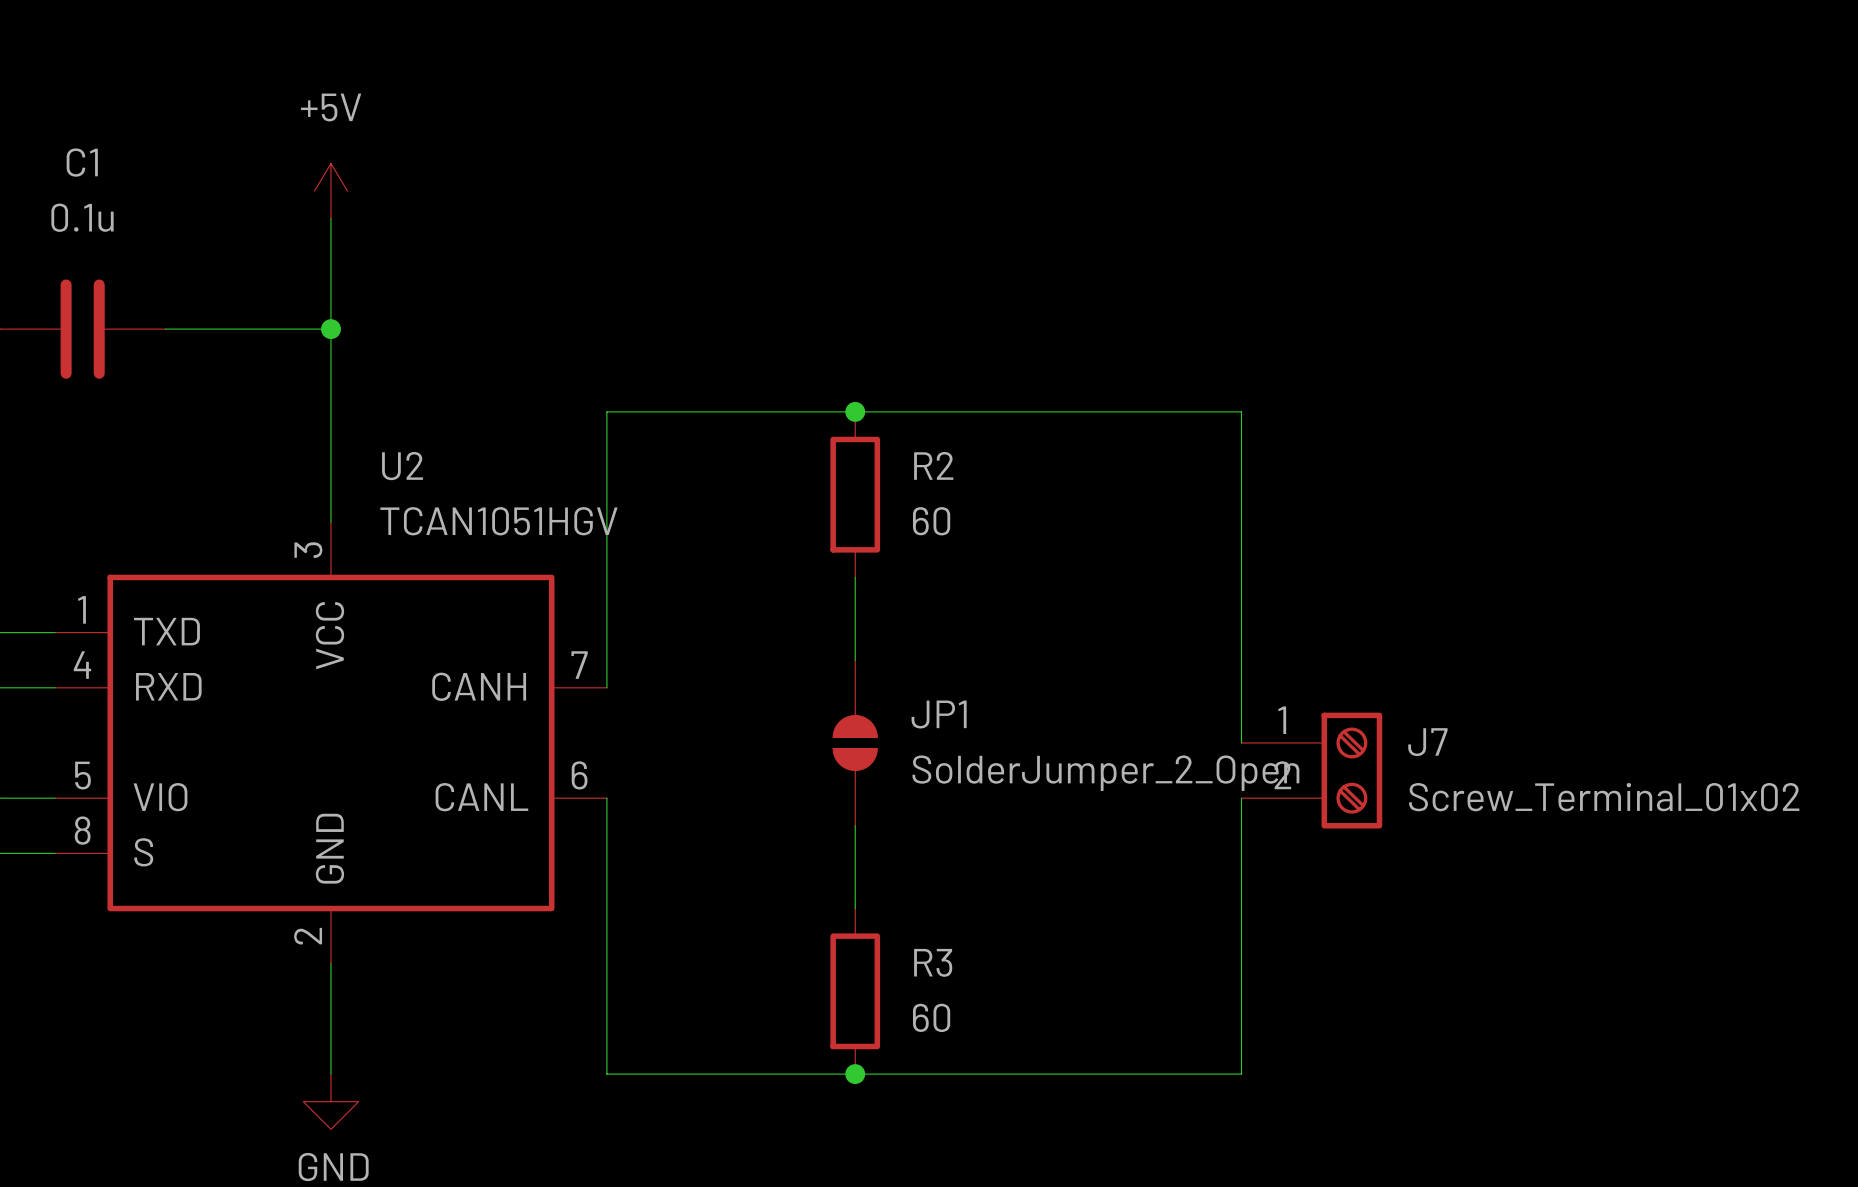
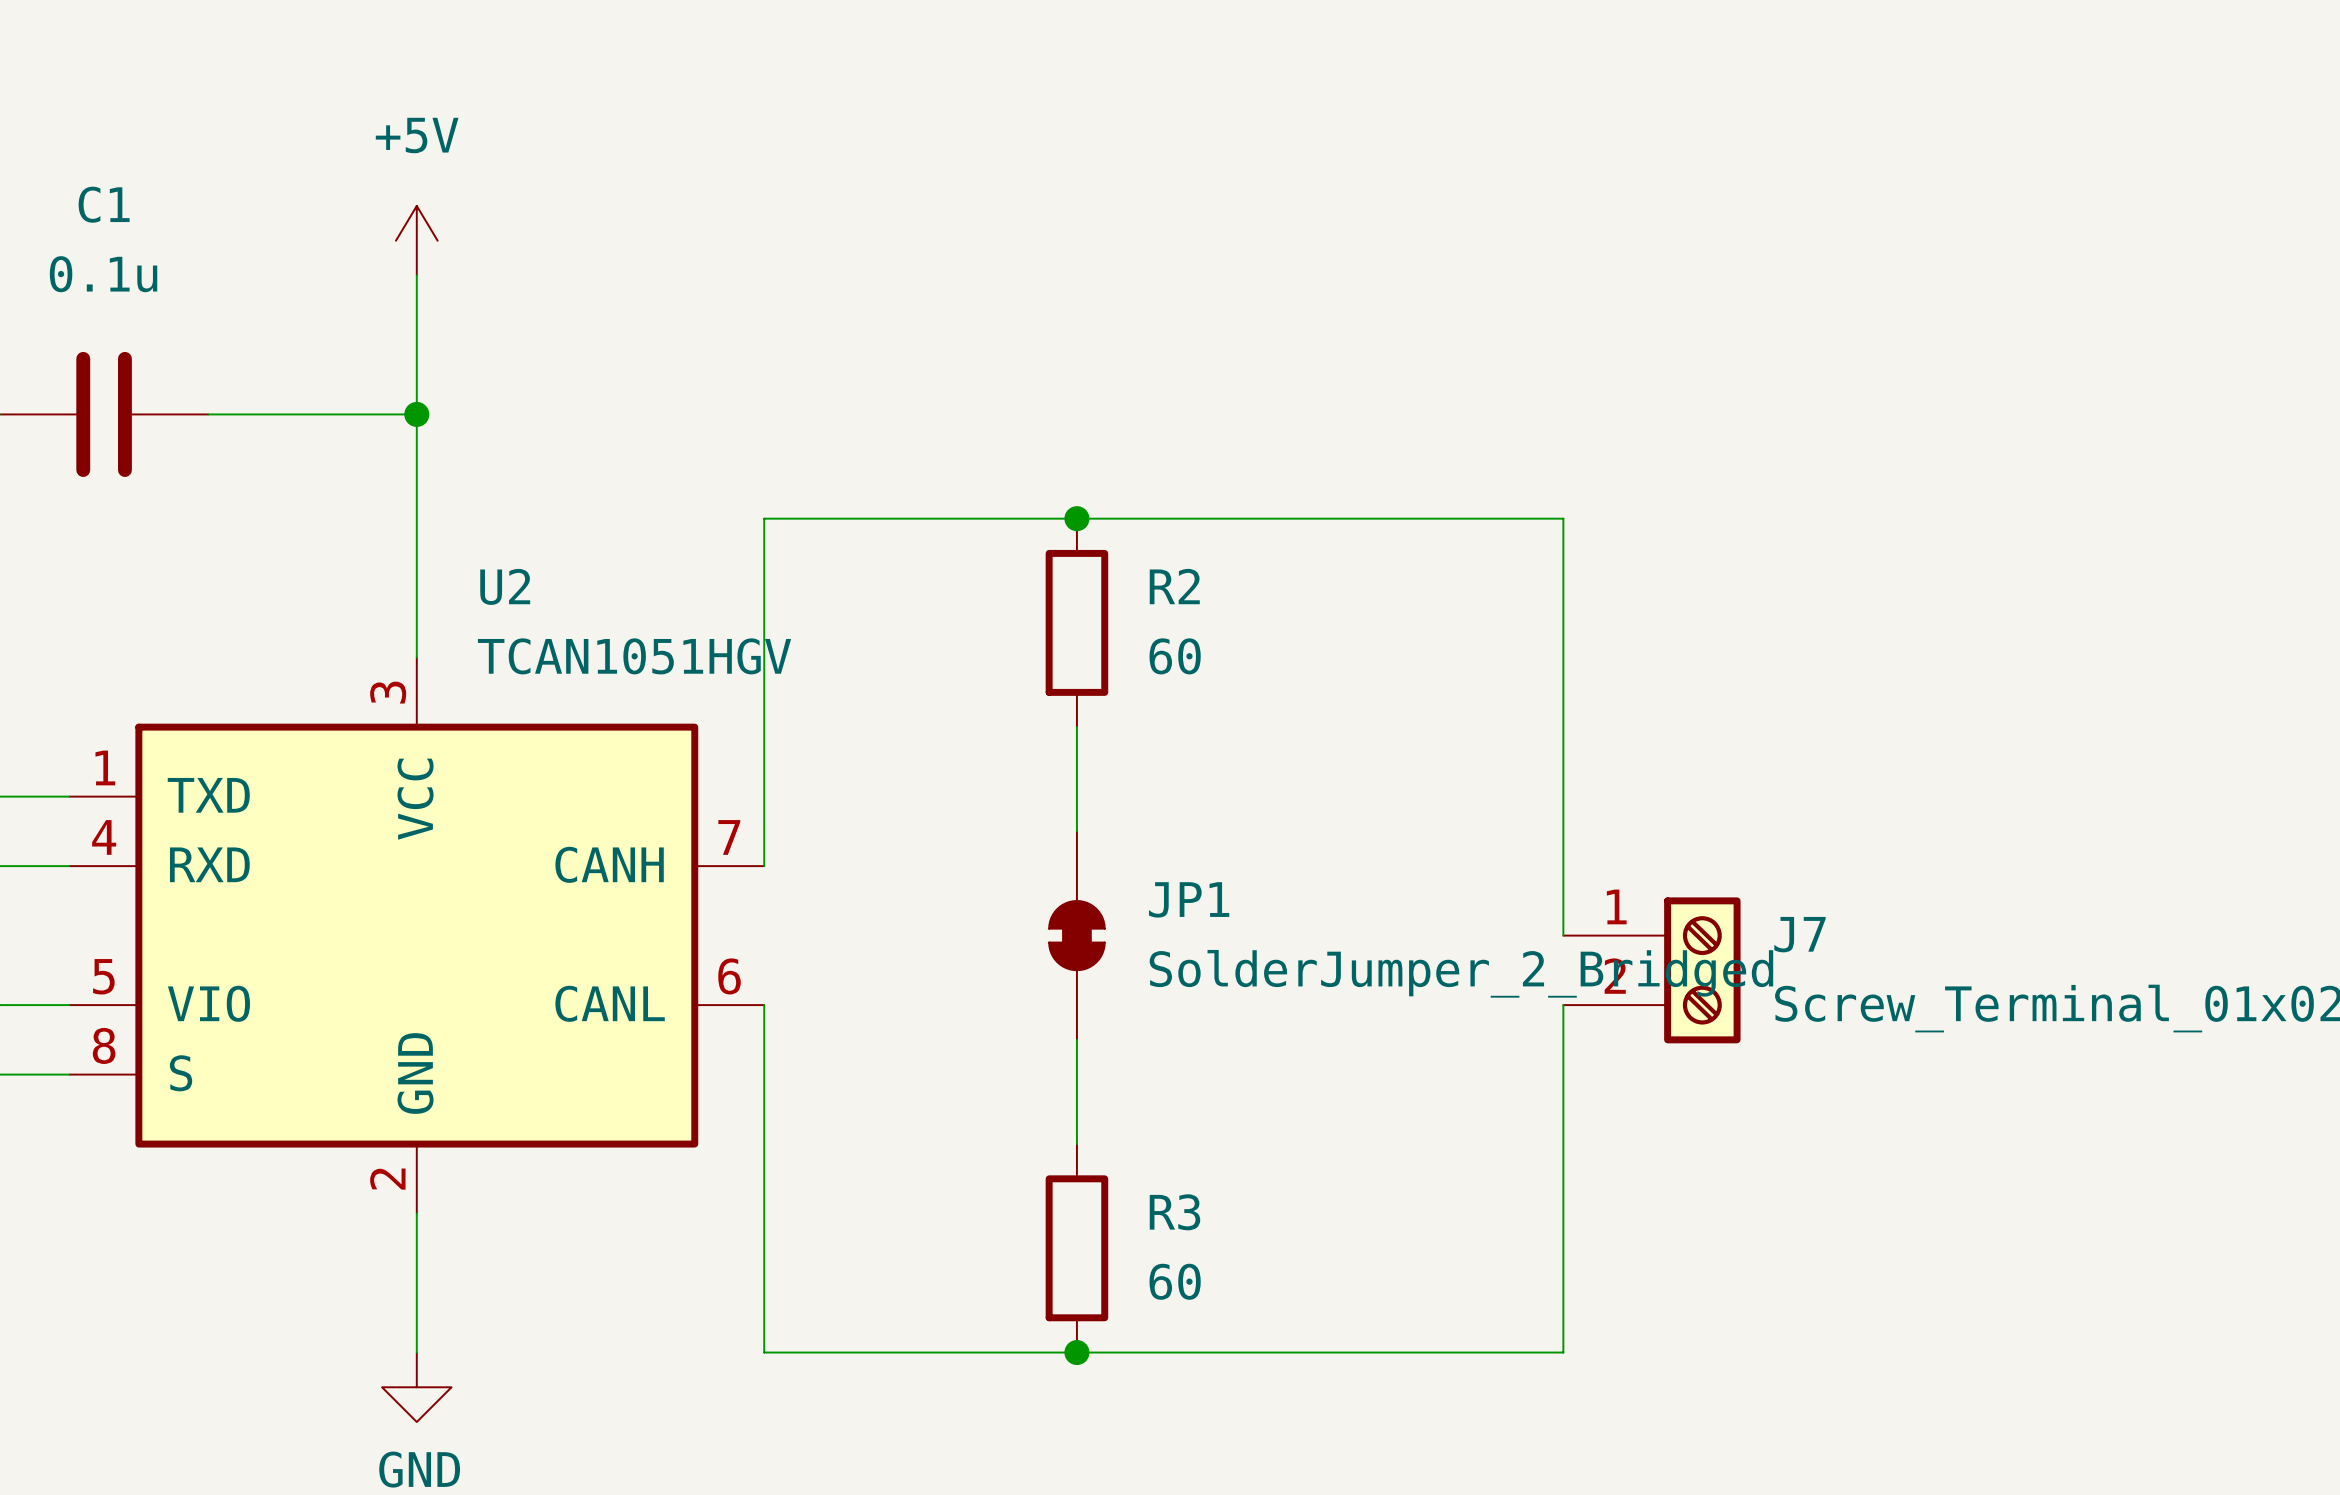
JP1 symbol: [833, 660, 878, 826] -> [1049, 831, 1105, 1040]
JP1 value: SolderJumper_2_Open (1105, 773) -> SolderJumper_2_Bridged (1461, 973)

